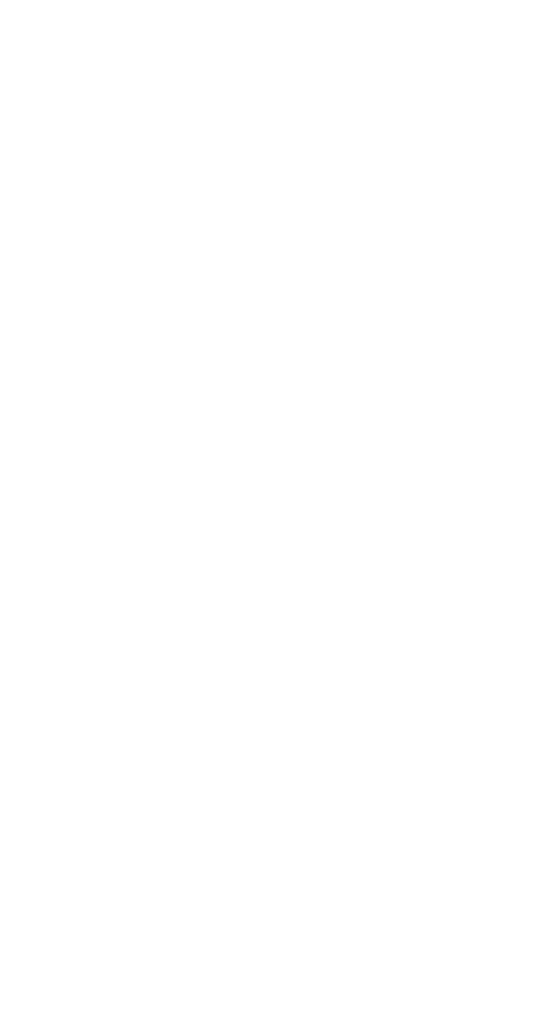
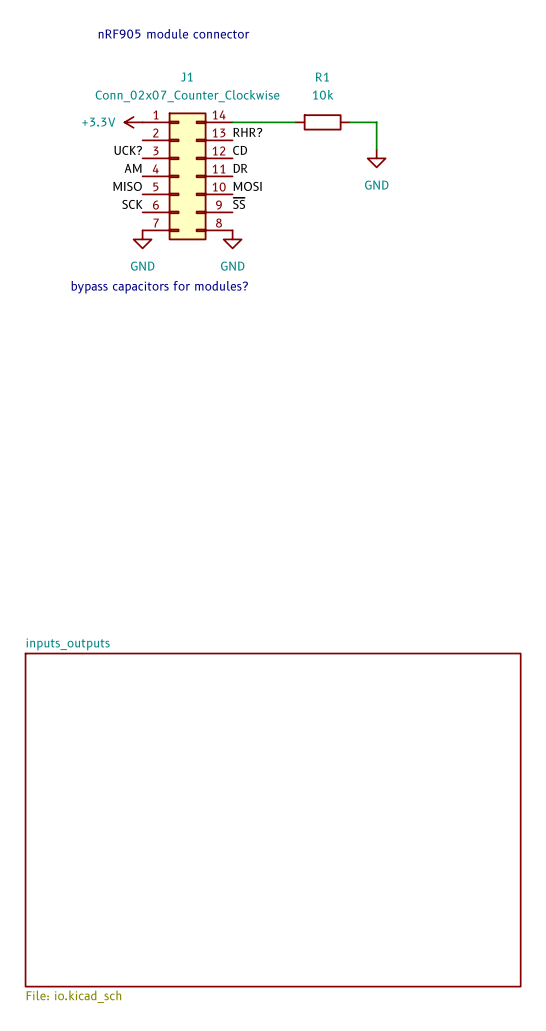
text: none -> nRF905 module connector (173, 33)
power symbol: none -> +3.3V (133, 122)
wire: none -> (232, 122) (295, 122)
R1: none -> 10k (322, 122)
wire: none -> (349, 122) (376, 122) (376, 149)
label: none -> RHR? (247, 132)
label: none -> UCK? (128, 150)
label: none -> CD (240, 150)
power symbol: none -> GND (376, 158)
label: none -> AM (133, 168)
label: none -> DR (240, 168)
J1: none -> Conn_02x07_Counter_Clockwise (187, 176)
label: none -> MISO (127, 186)
label: none -> MOSI (247, 186)
label: none -> ~{SS} (239, 203)
label: none -> SCK (132, 204)
power symbol: none -> GND (142, 239)
power symbol: none -> GND (232, 239)
text: none -> bypass capacitors for modules? (159, 287)
sheet inputs_outputs: none -> File: io.kicad_sch (273, 820)

